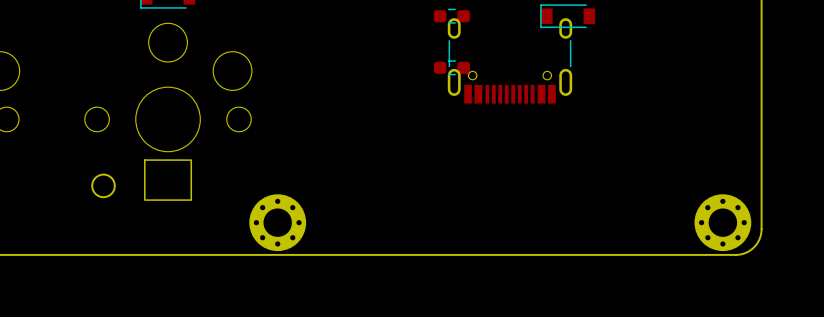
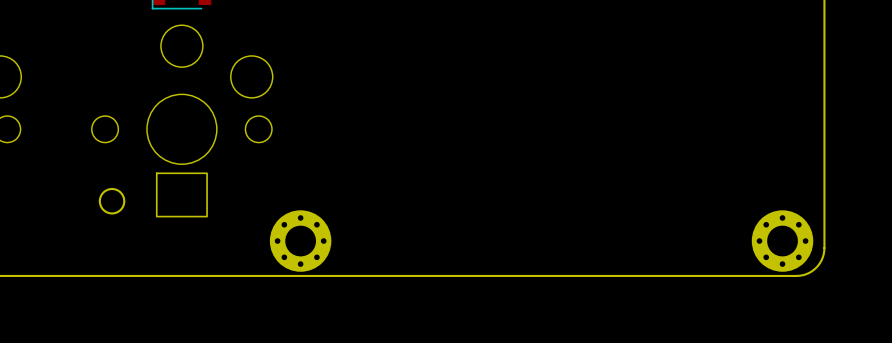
part: (451, 16) -> none
part: (567, 16) -> none
part: (509, 60) -> none
part: (451, 67) -> none

